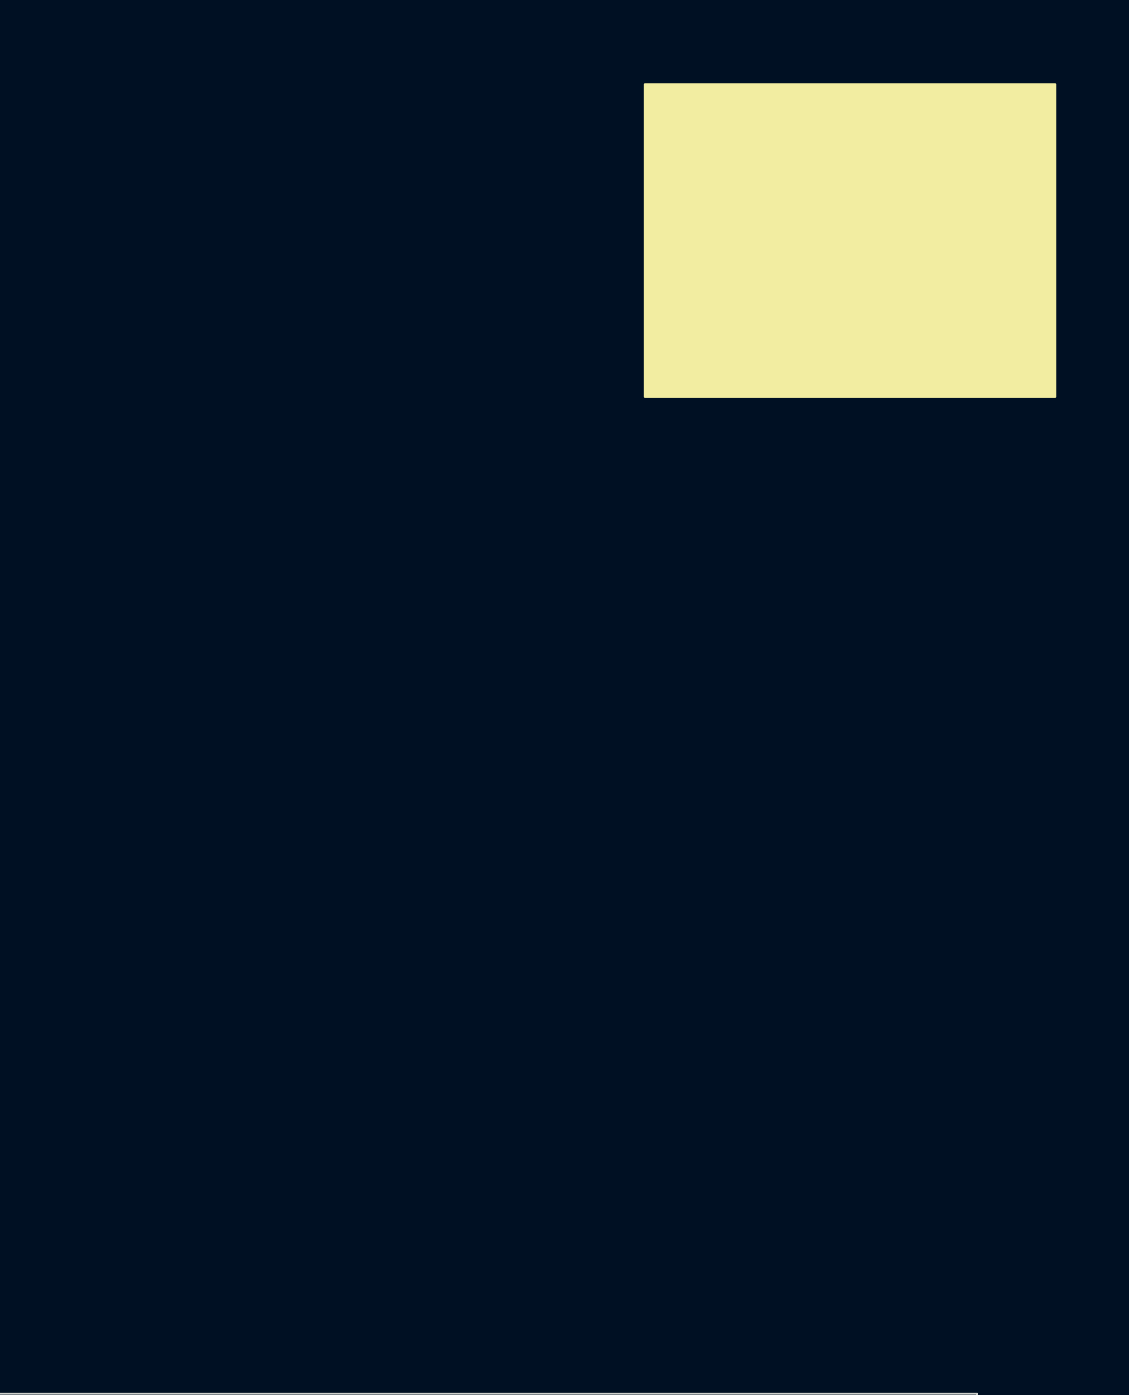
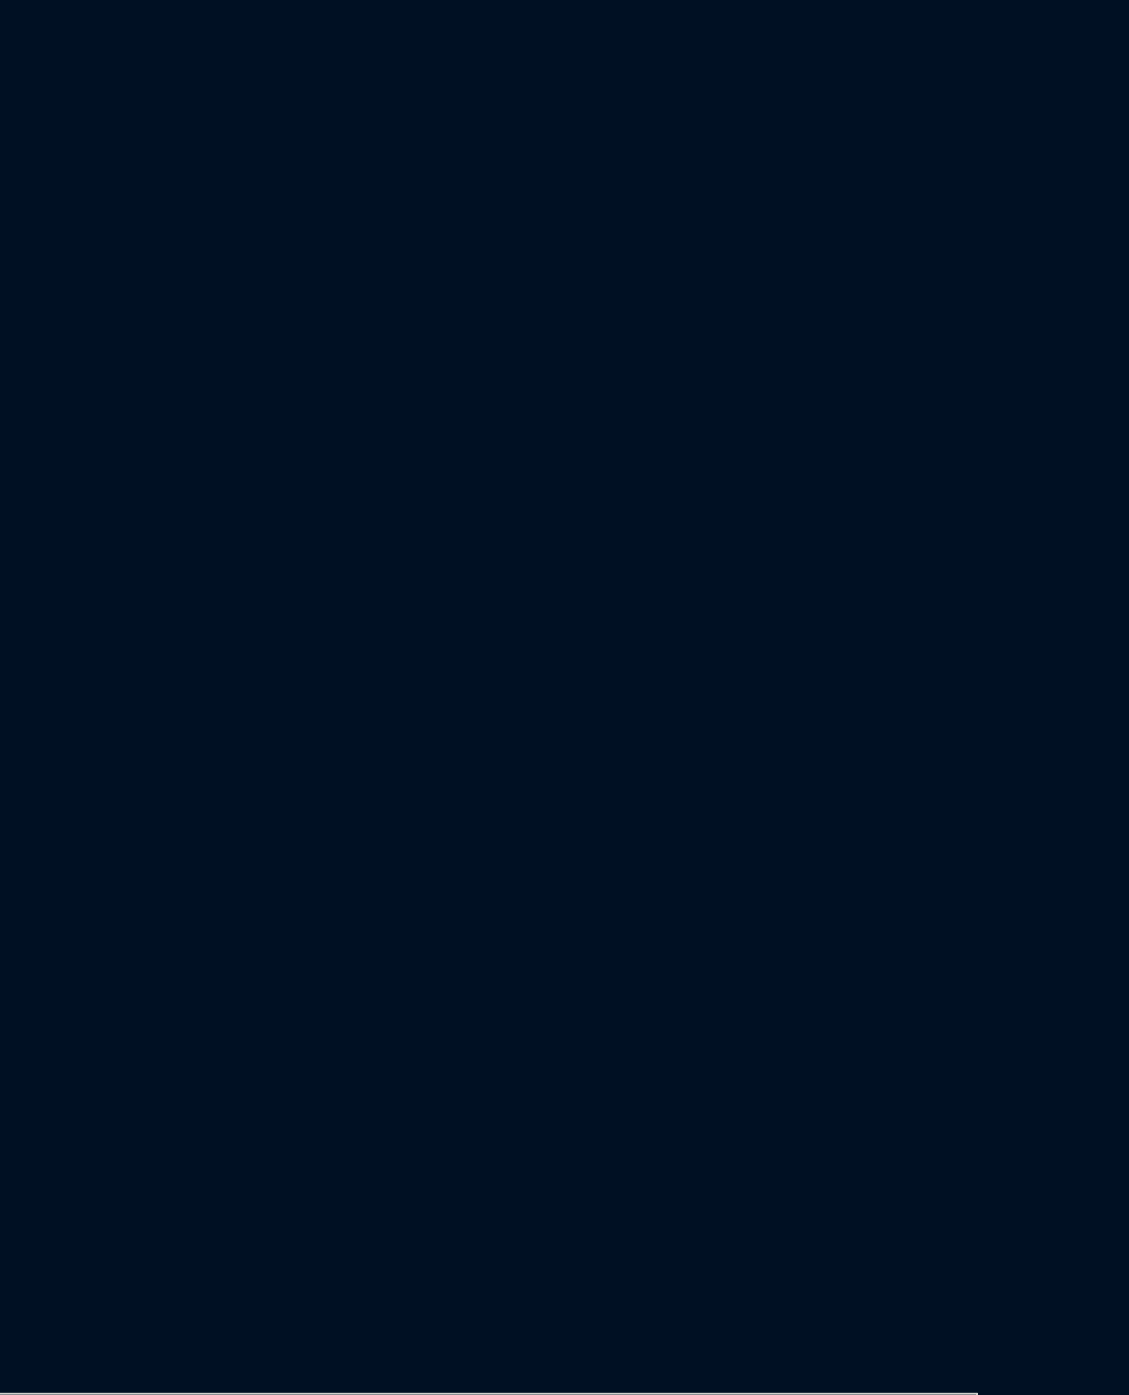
drawing: [643, 83, 1057, 398] -> none

